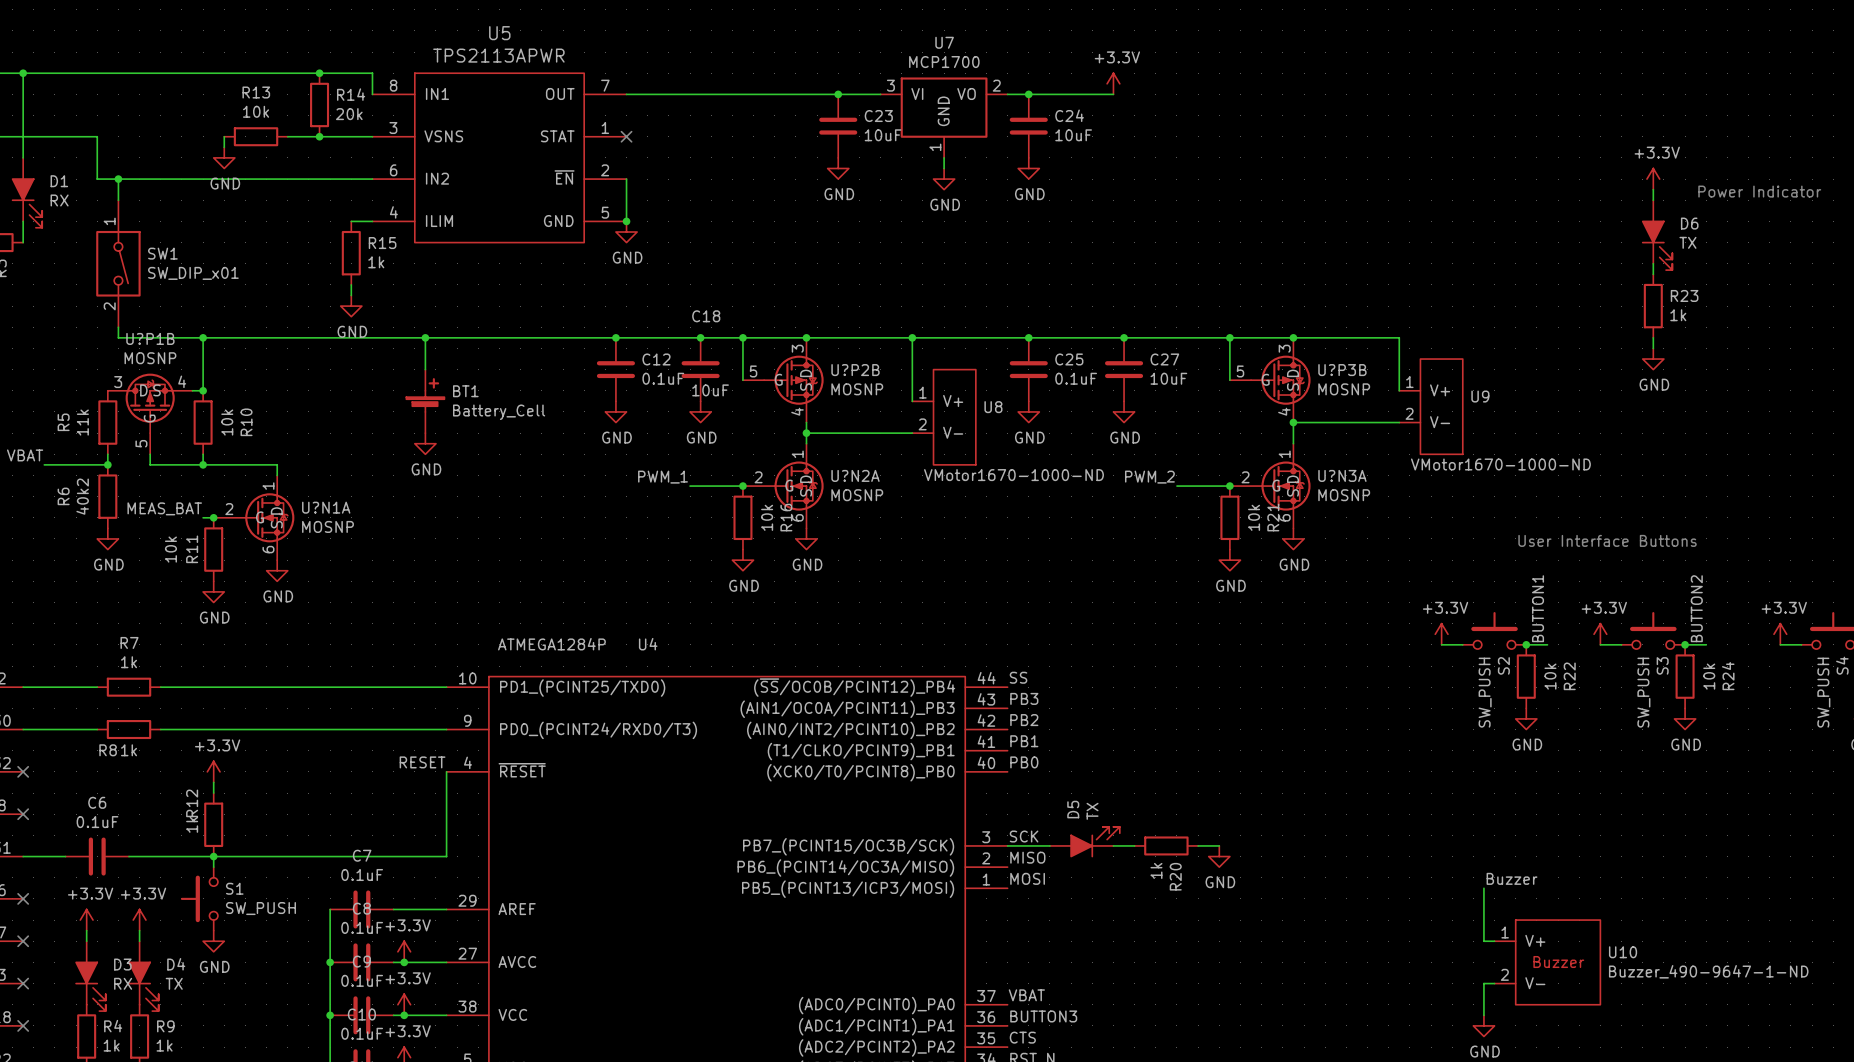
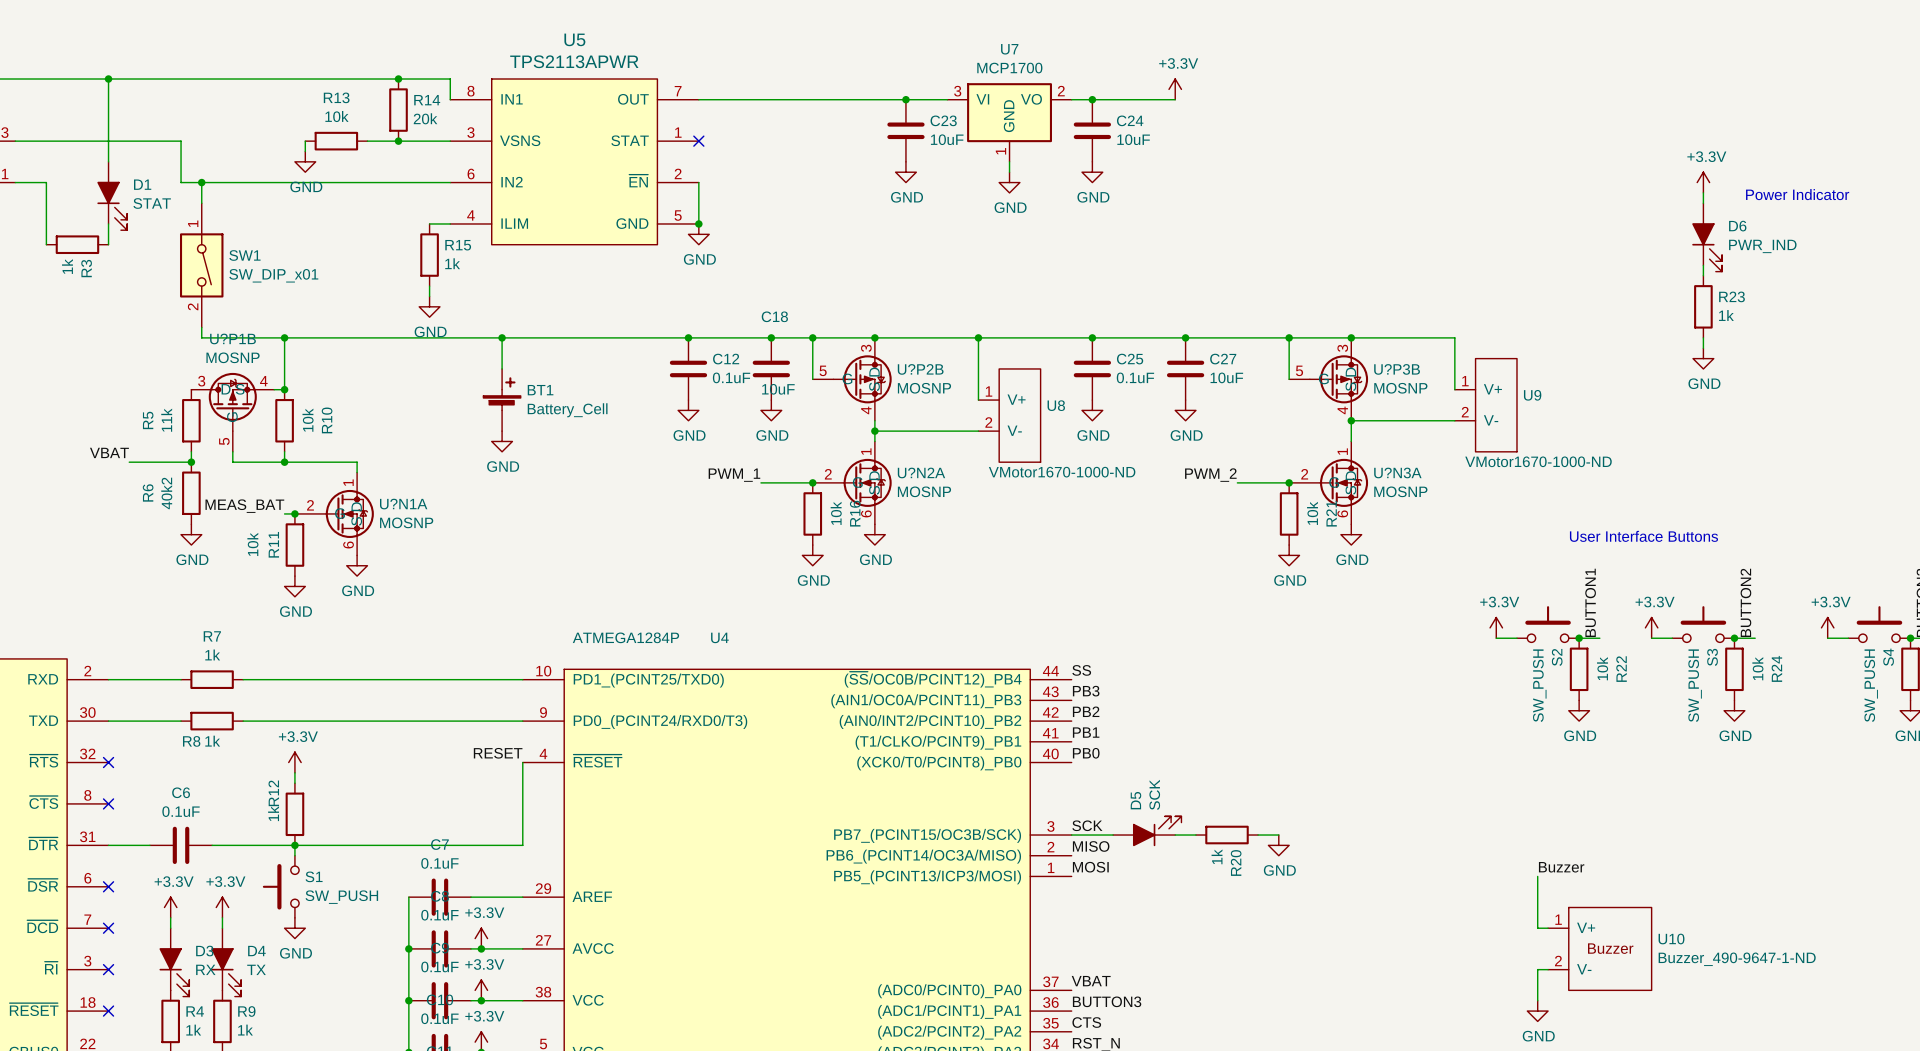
D1 value: RX (59, 200) -> STAT (152, 203)
D6 value: TX (1687, 242) -> PWR_IND (1762, 246)
D5 value: TX (1092, 811) -> SCK (1154, 794)

